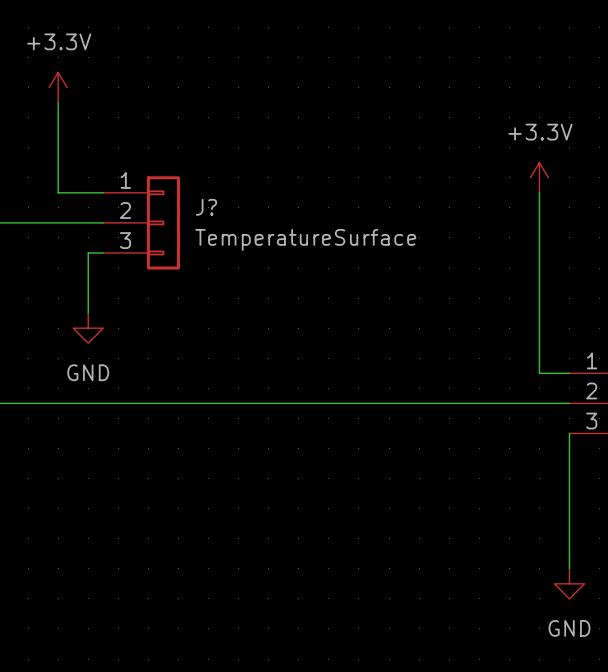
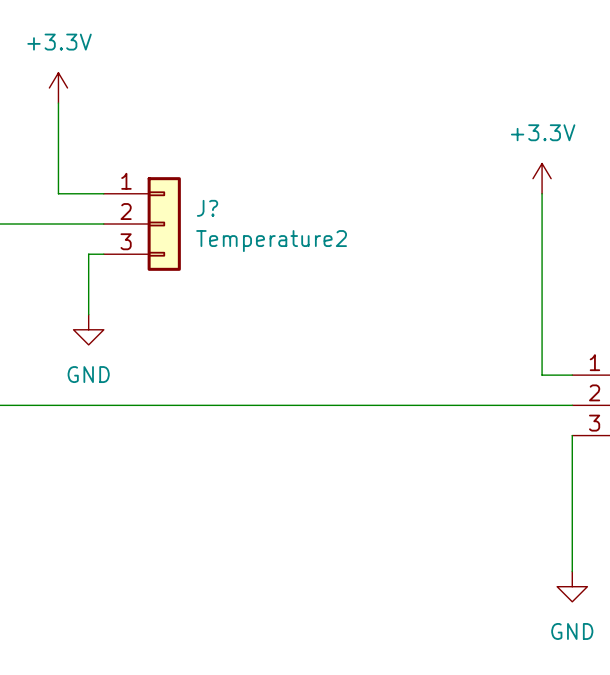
J? value: TemperatureSurface (305, 239) -> Temperature2 (271, 241)

